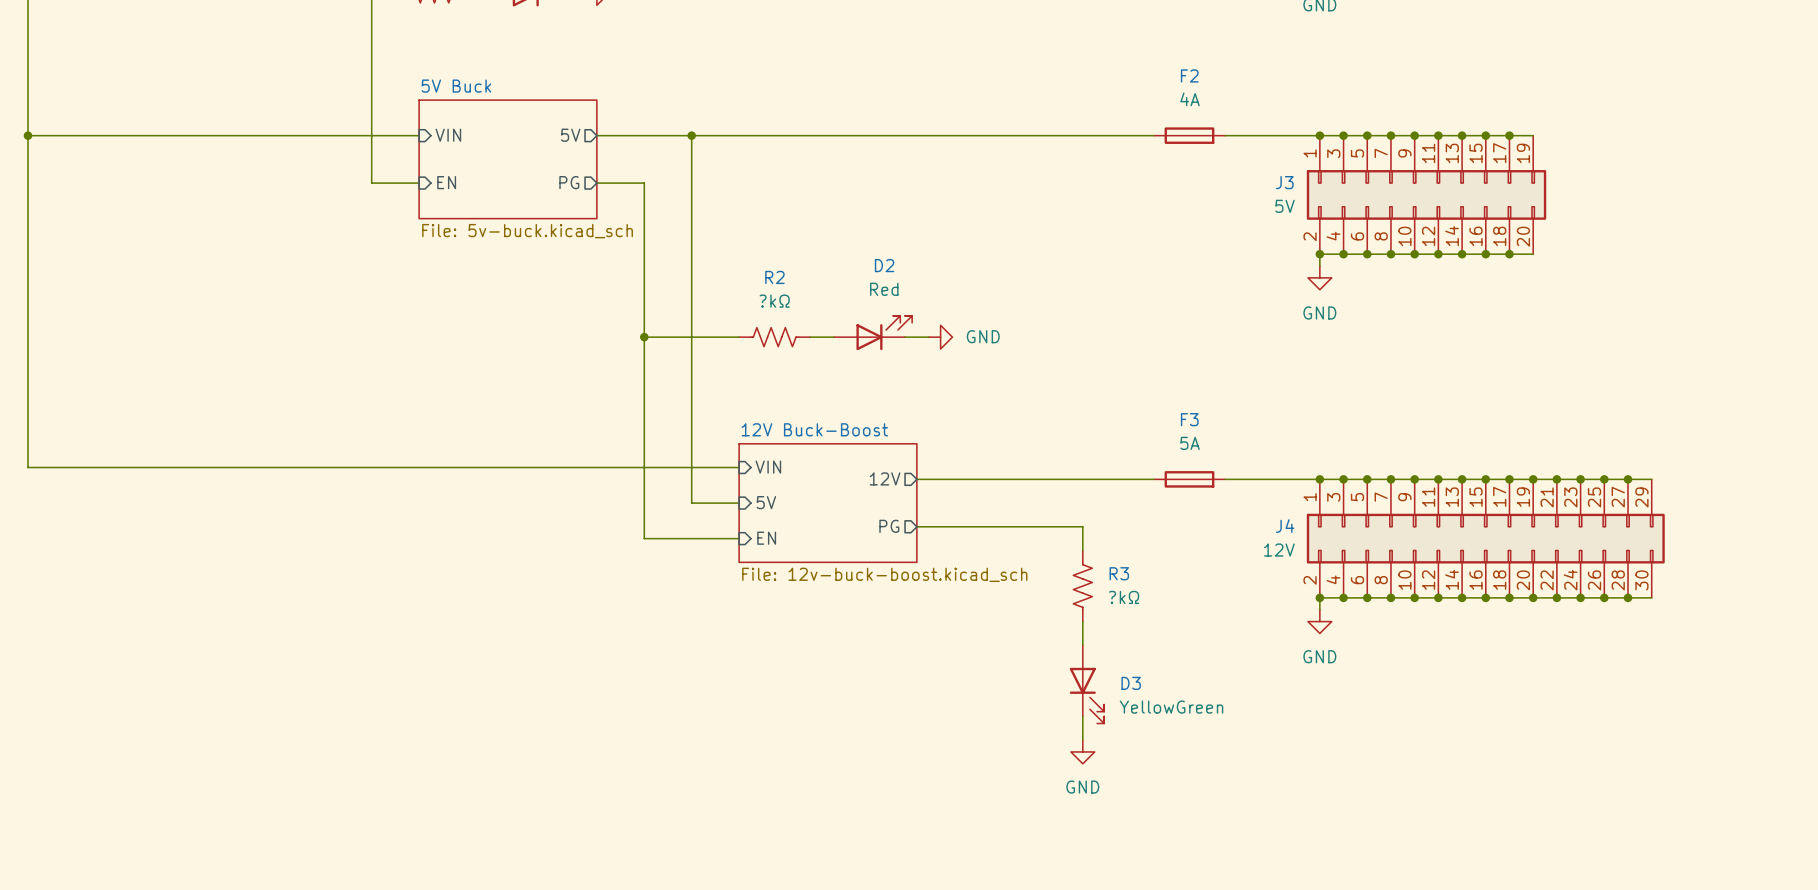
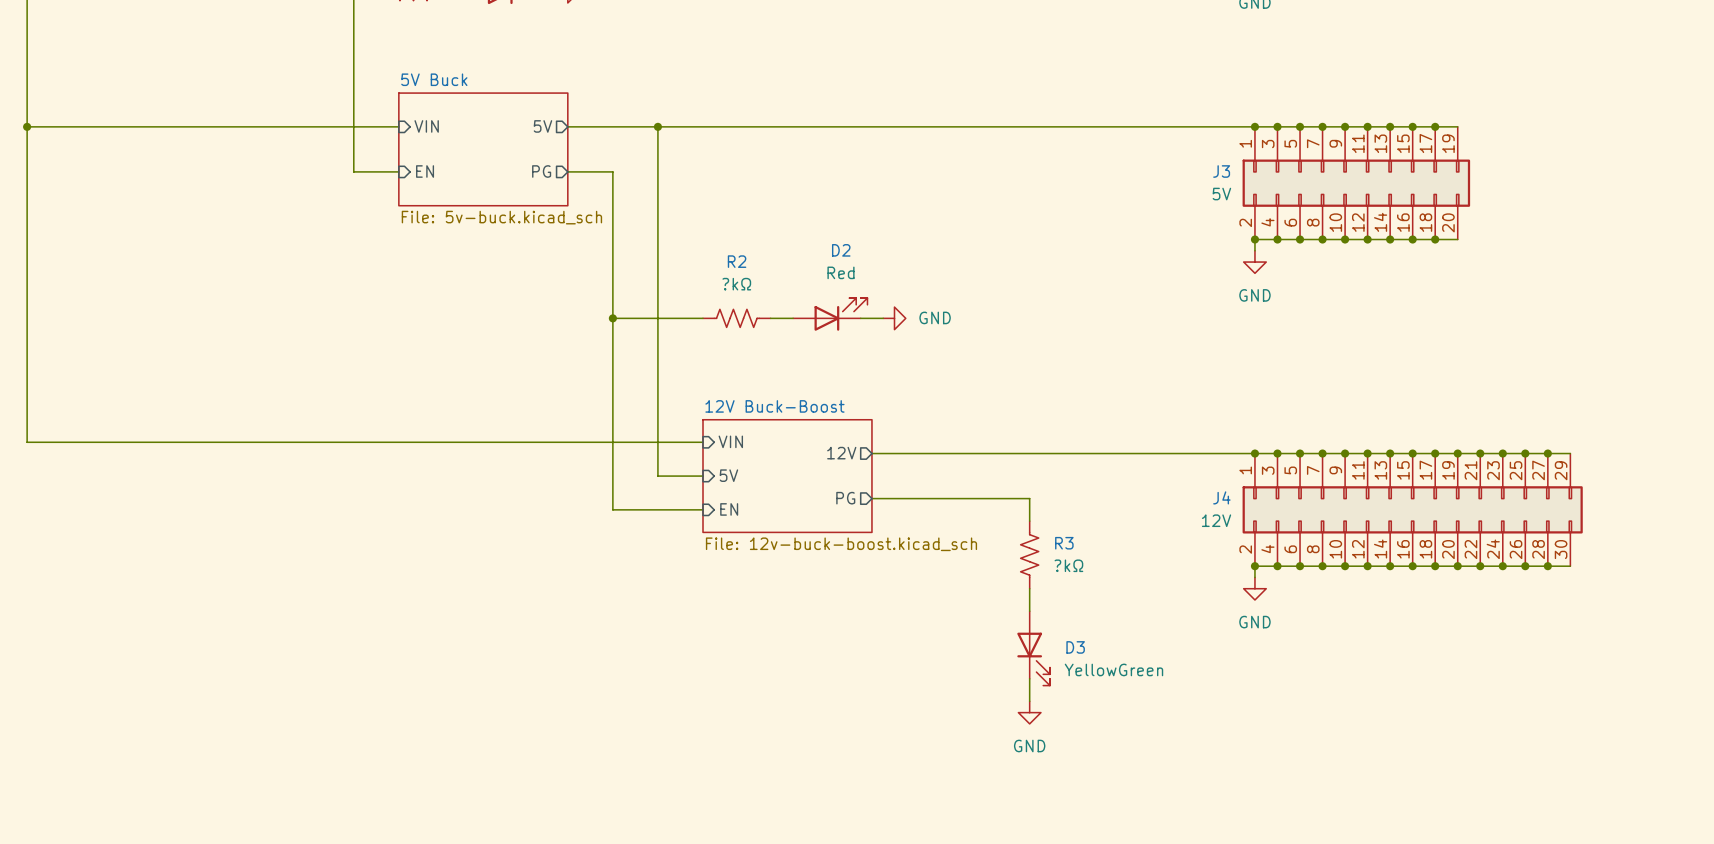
F2: 4A (1189, 135) -> none
F3: 5A (1189, 479) -> none

